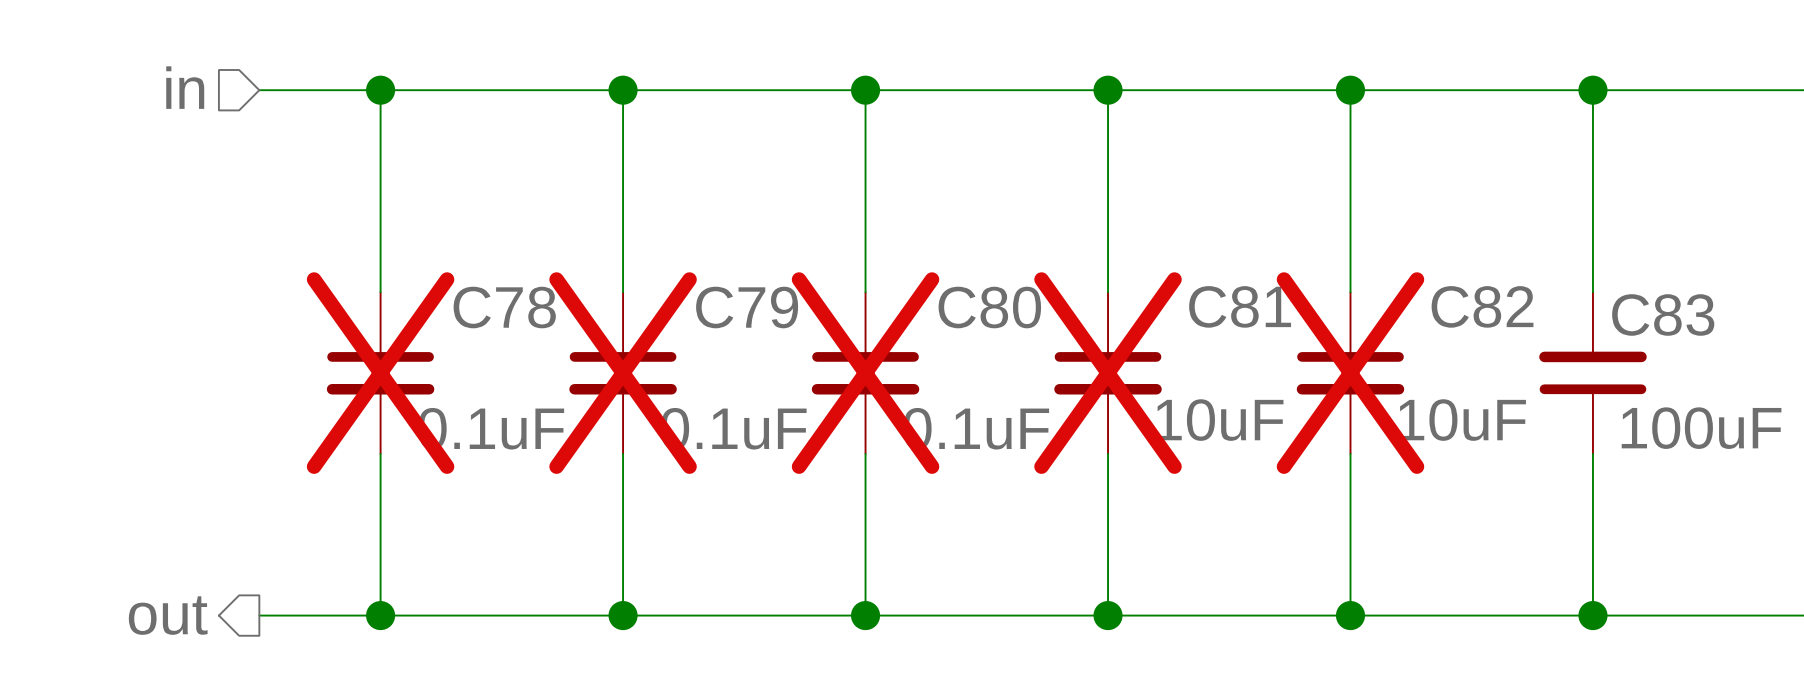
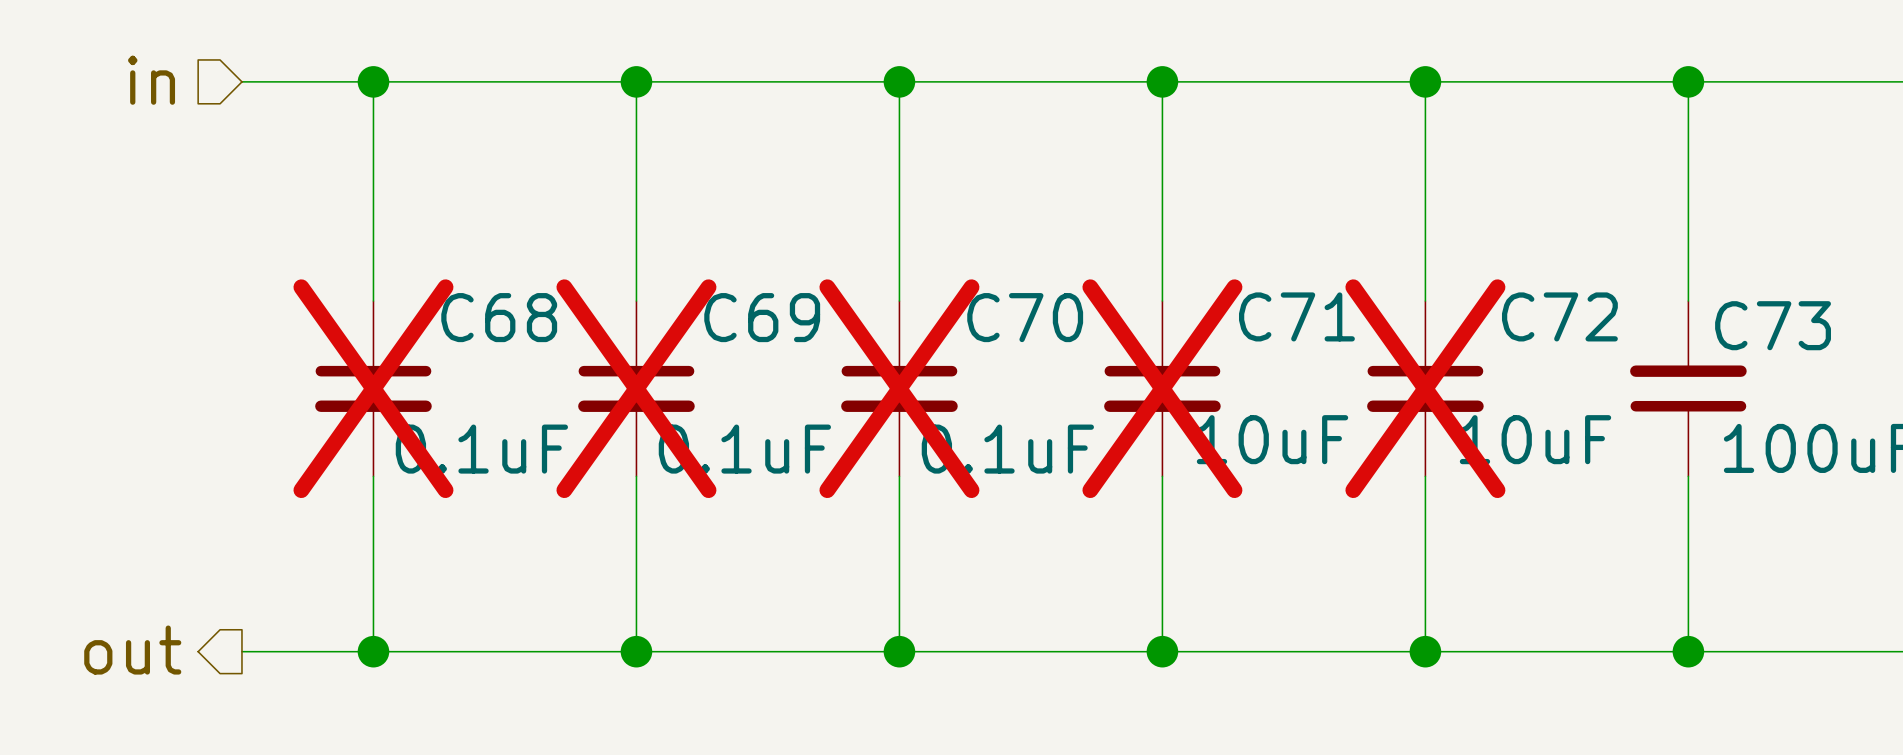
C81 name: C81 (1240, 306) -> C71 (1296, 316)
C82 name: C82 (1482, 306) -> C72 (1559, 316)
C78 name: C78 (504, 307) -> C68 (499, 317)
C79 name: C79 (747, 307) -> C69 (762, 317)
C80 name: C80 (989, 307) -> C70 (1025, 317)
C83 name: C83 (1663, 314) -> C73 (1773, 325)

